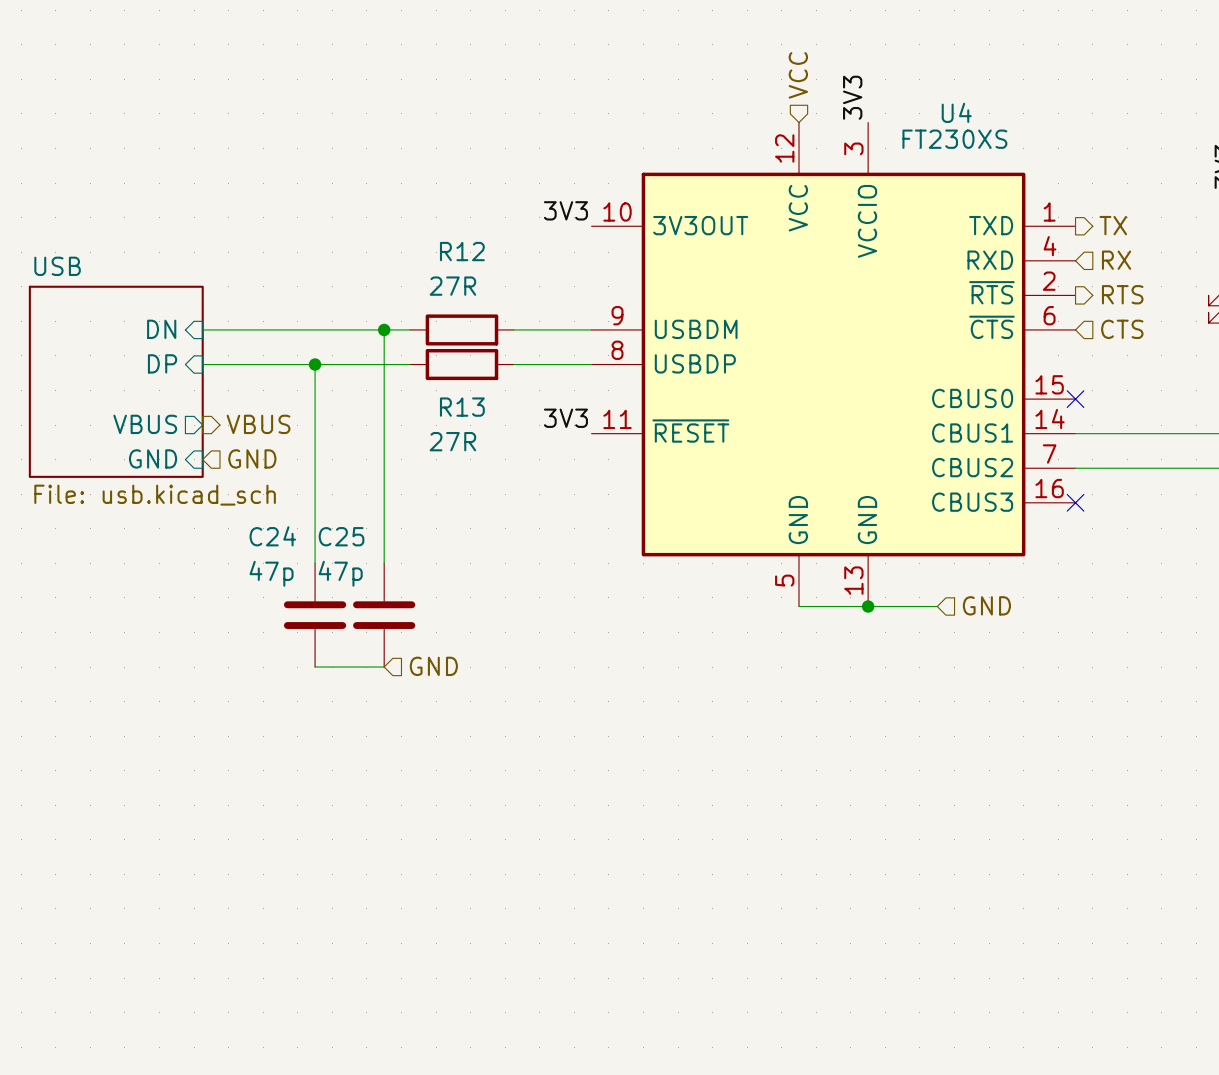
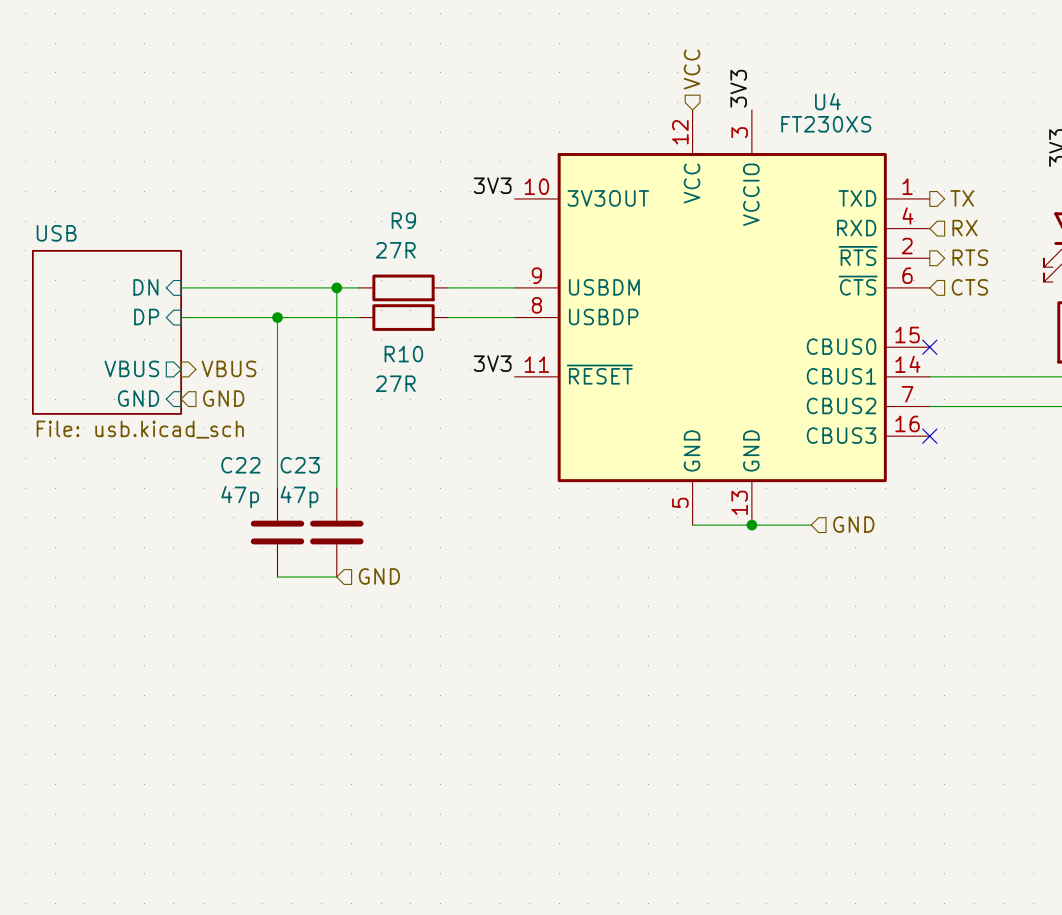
R12 name: R12 (462, 251) -> R9 (403, 220)
R13 name: R13 (462, 407) -> R10 (403, 354)
C24 name: C24 (272, 536) -> C22 (240, 465)
C25 name: C25 (341, 536) -> C23 (300, 465)

